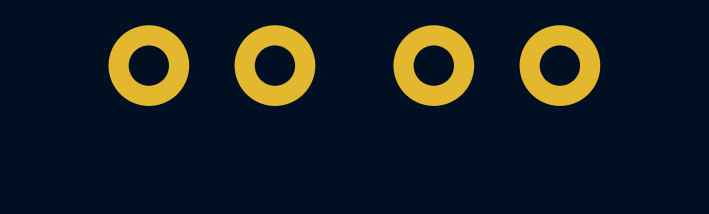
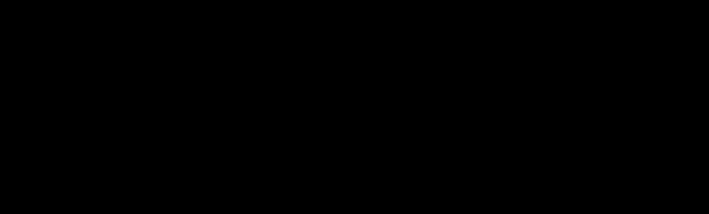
part: (211, 65) -> none
part: (496, 65) -> none

